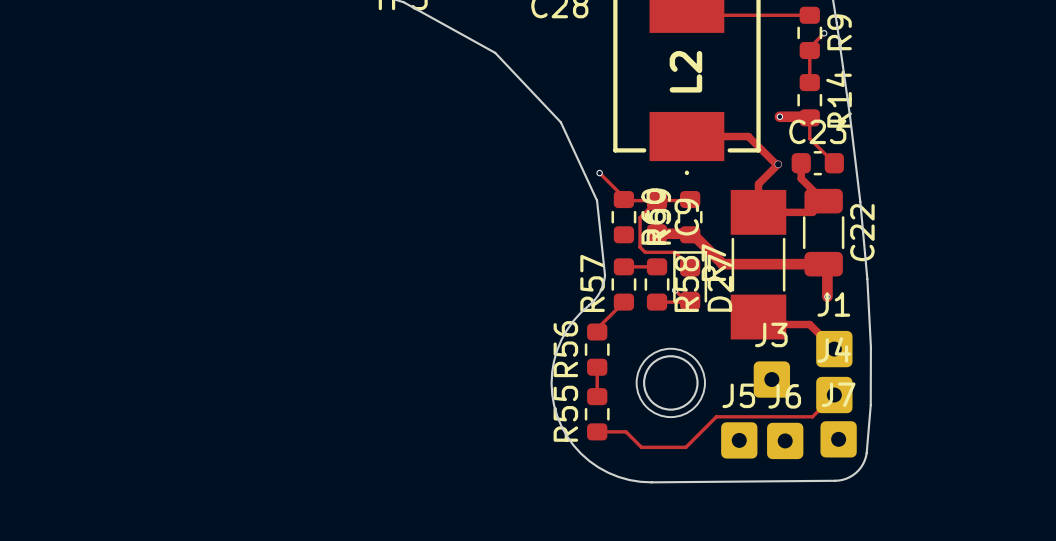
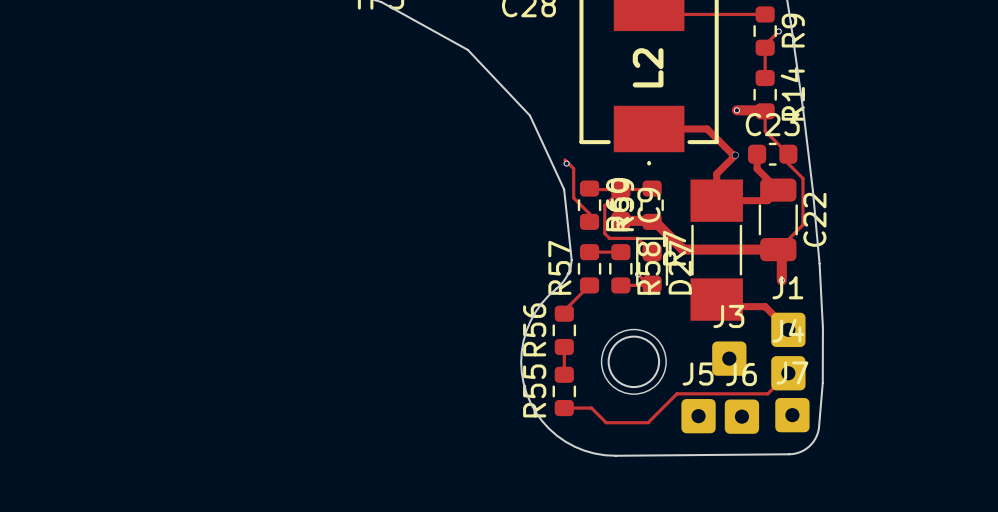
track: none -> (788, 154) (788, 163) (803, 178) (803, 224) (778, 249)
track: none -> (564, 159) (573, 168) (573, 197) (589, 213) (589, 221)
track: (599, 173) (623, 199) -> none

